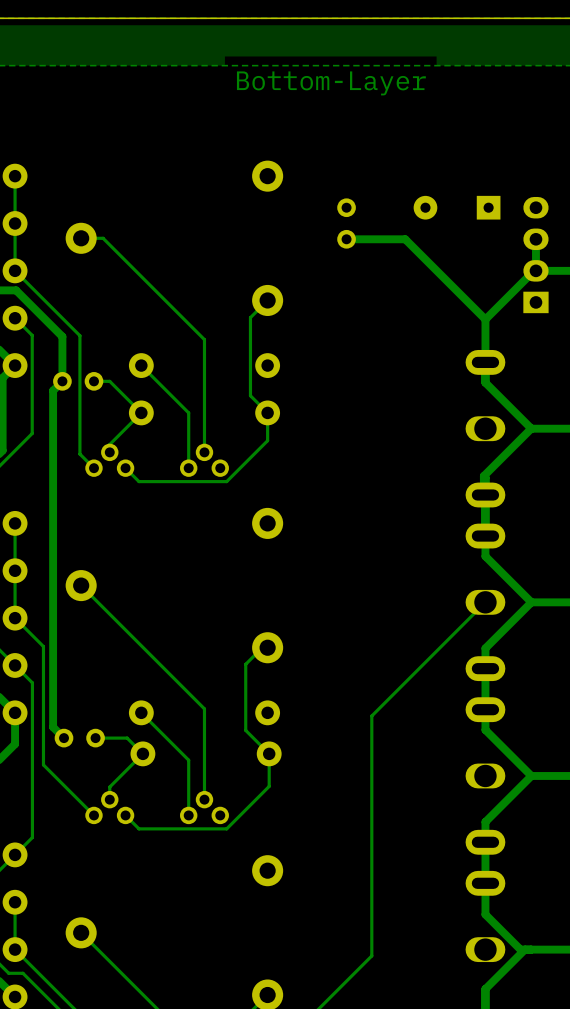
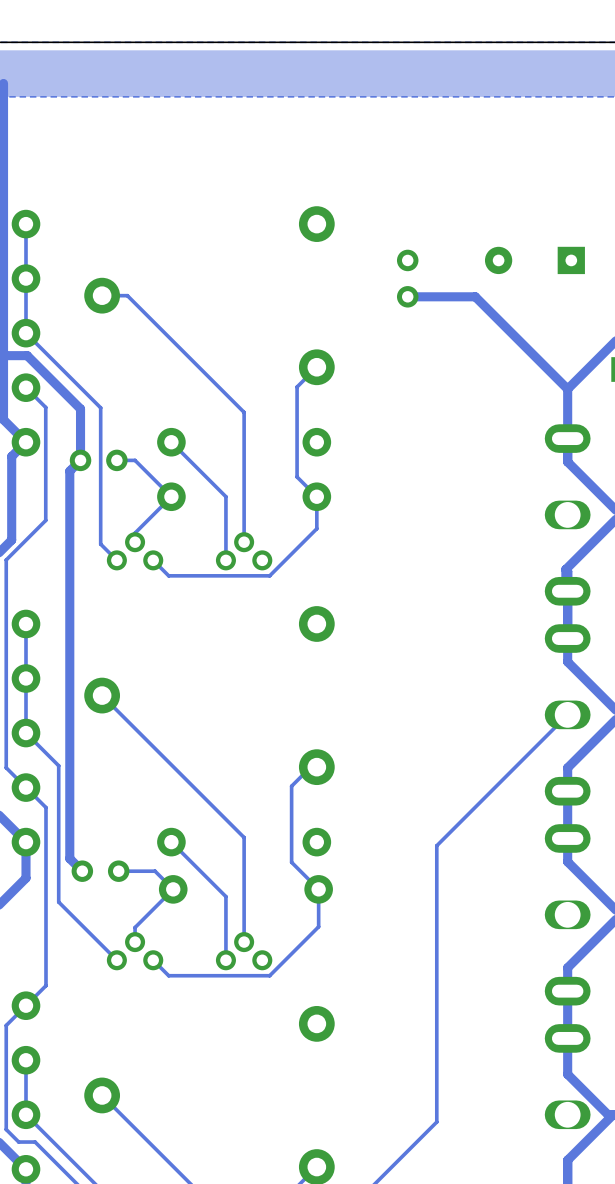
text: Bottom-Layer (331, 83) -> none

